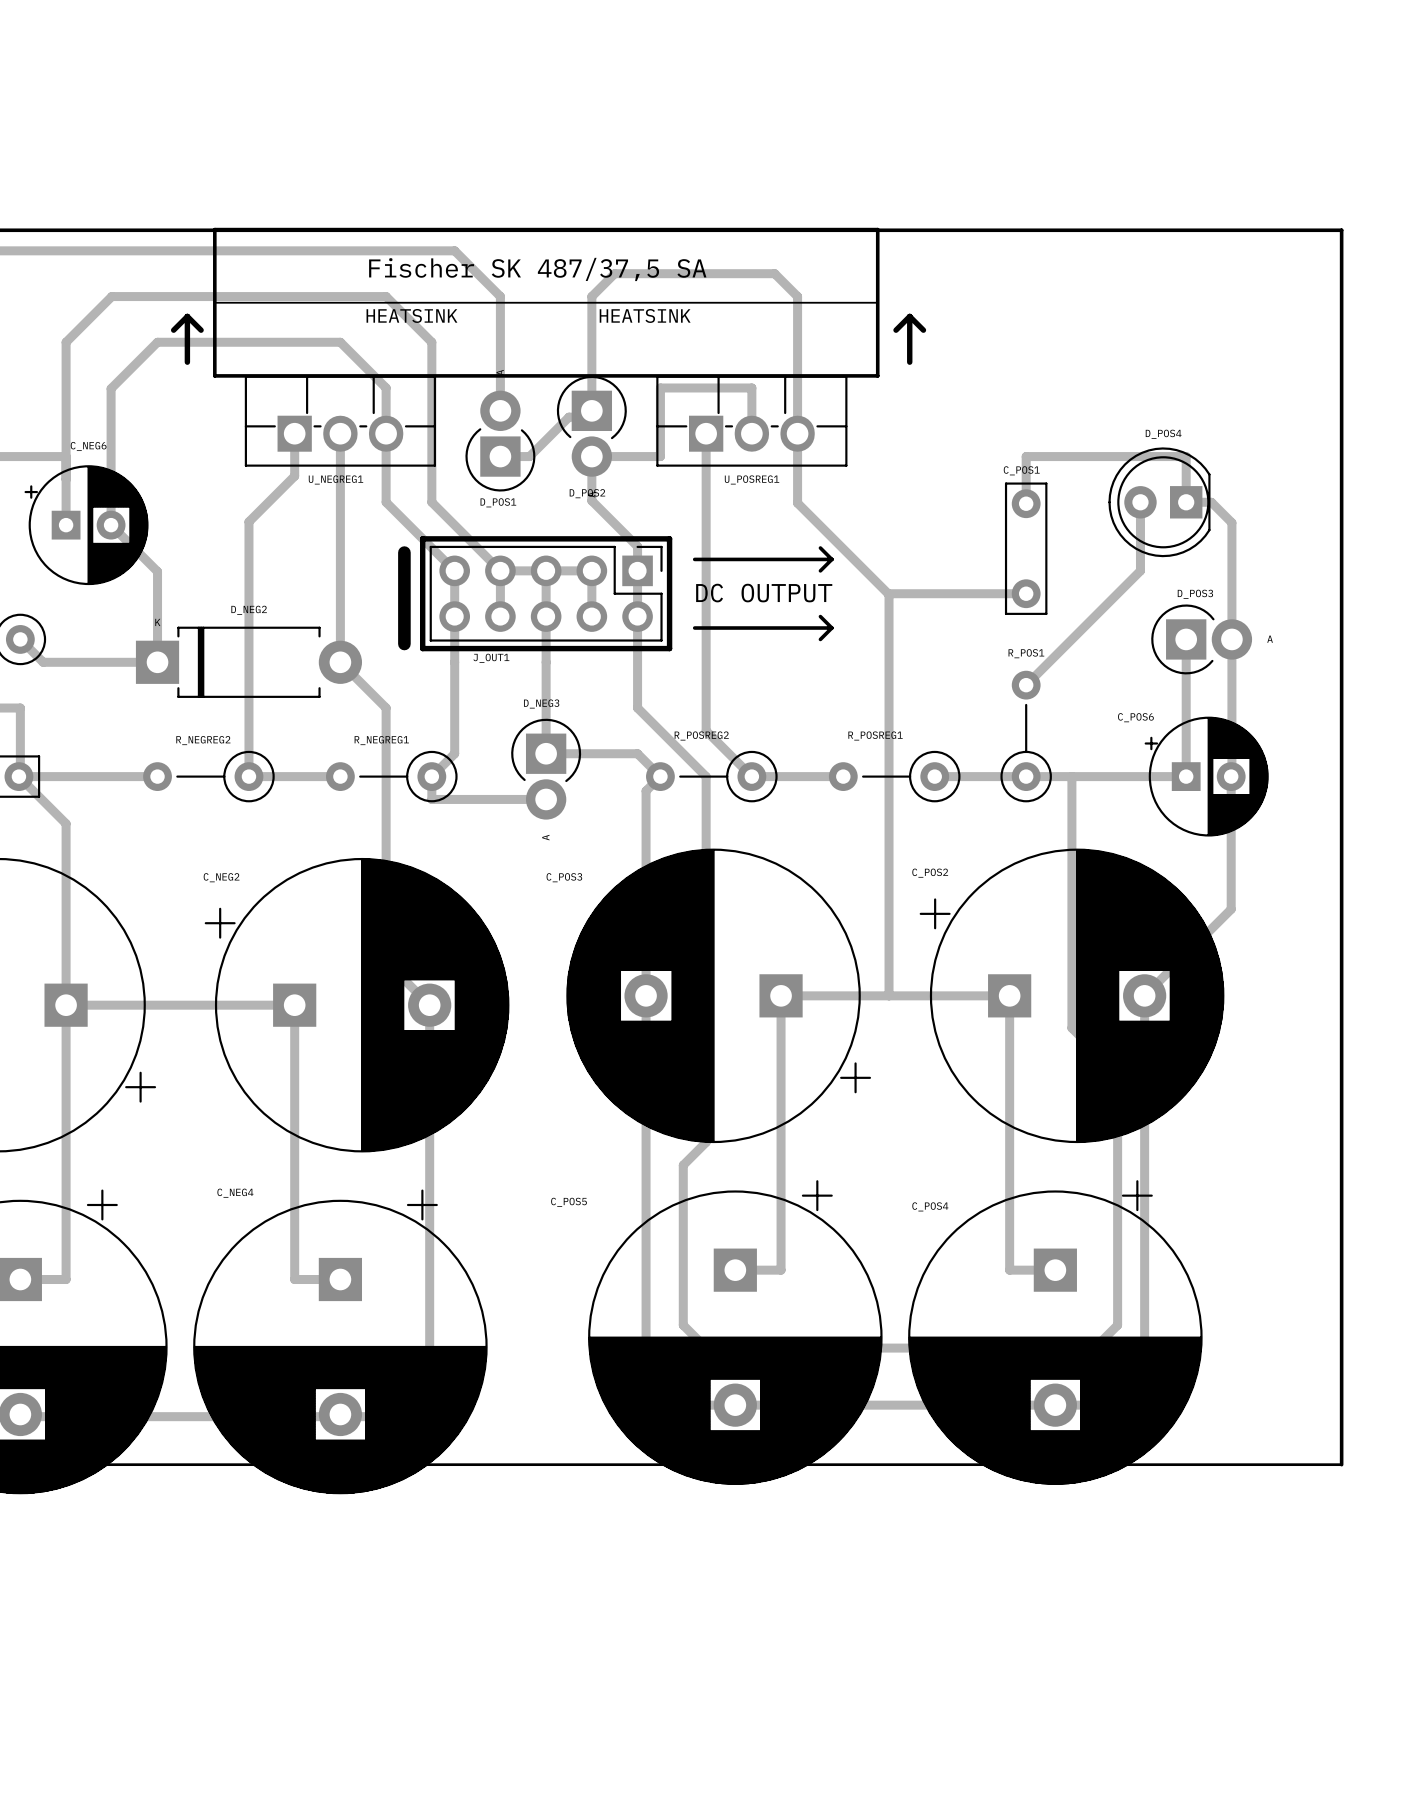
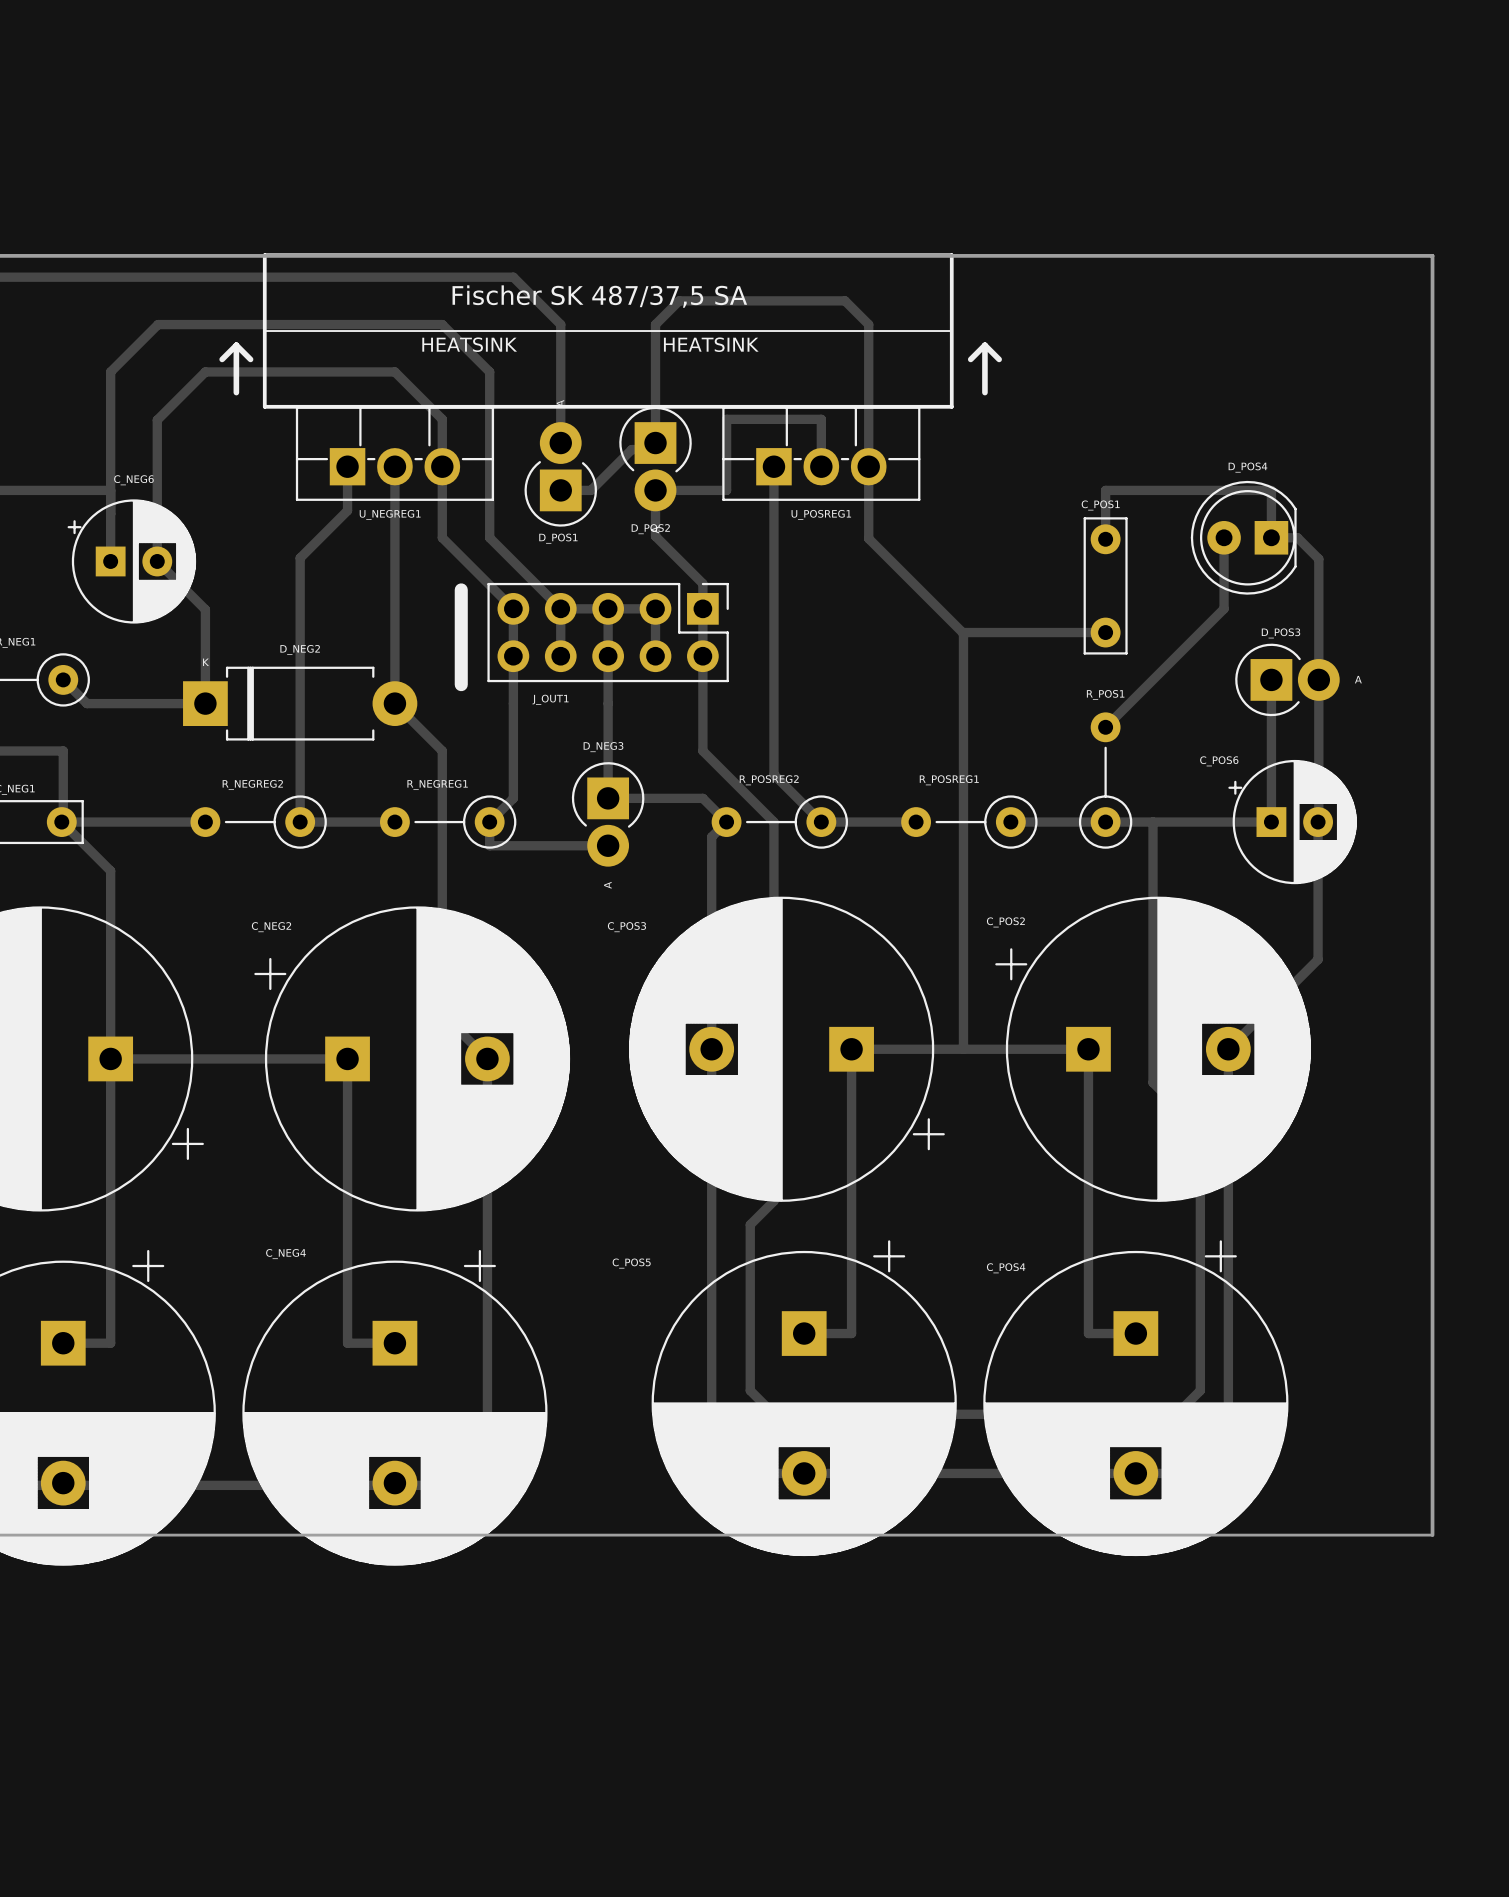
line: (422, 538) (422, 648) (669, 648) (669, 538) (422, 538) -> none
line: (820, 548) (831, 559) -> none
line: (694, 559) (831, 559) -> none
line: (831, 559) (820, 570) -> none
text: DC OUTPUT (764, 593) -> none
line: (820, 616) (831, 628) -> none
line: (694, 628) (831, 628) -> none
line: (831, 628) (820, 639) -> none

